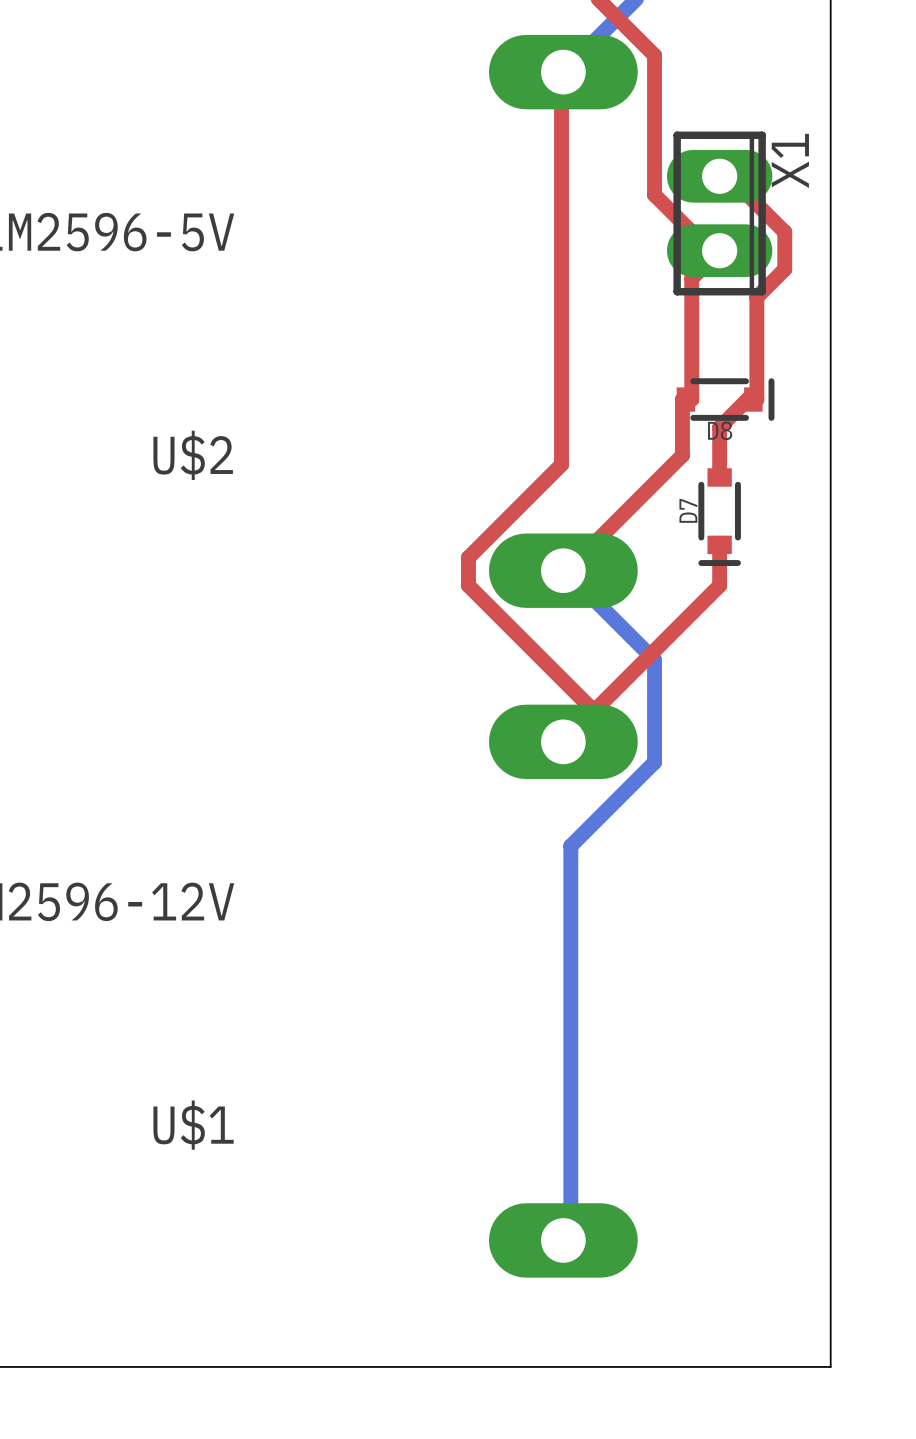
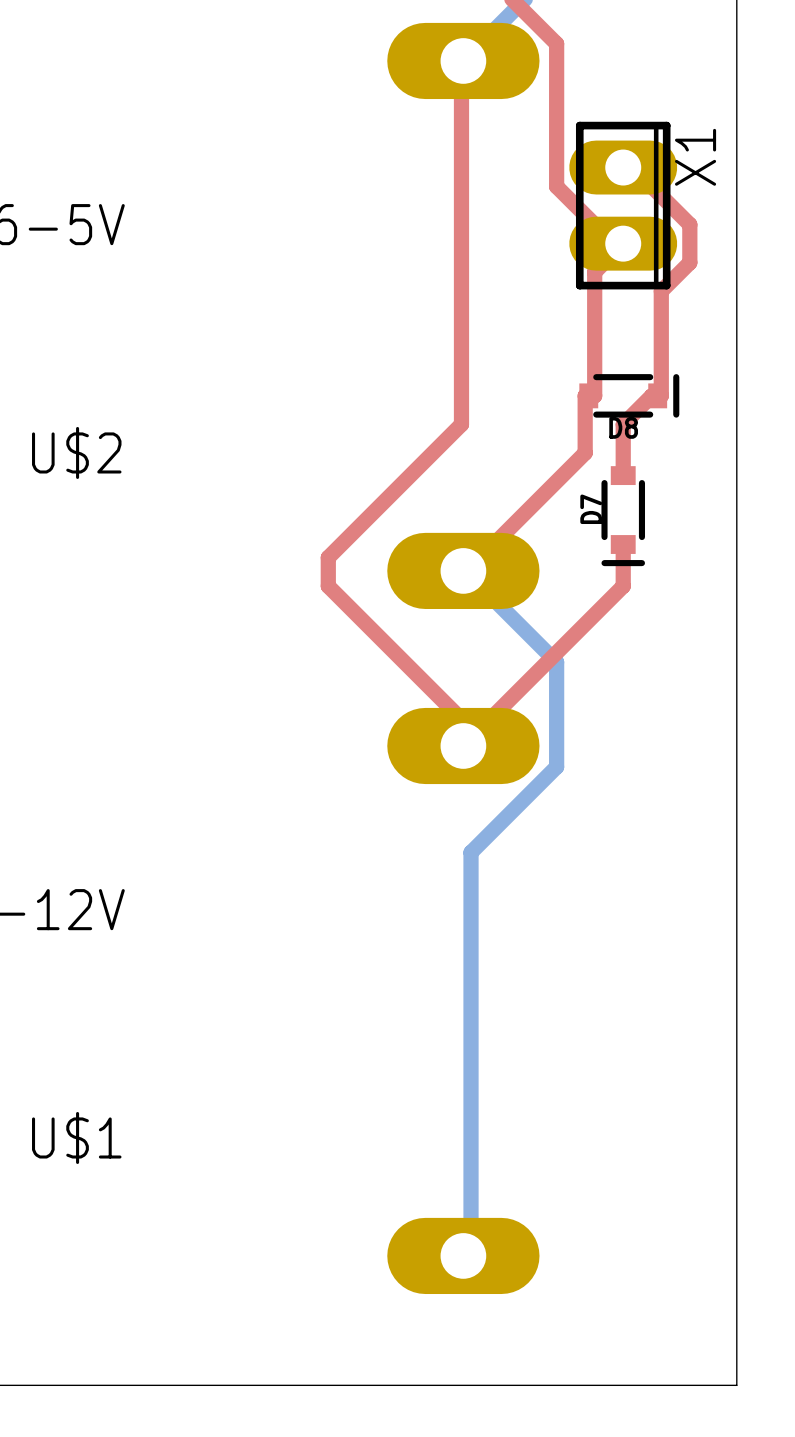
top track: (561, 427) (561, 464) (468, 557) (468, 585) (589, 706) (563, 741) -> (461, 424) (328, 557) (328, 586) (490, 747) (463, 745)

